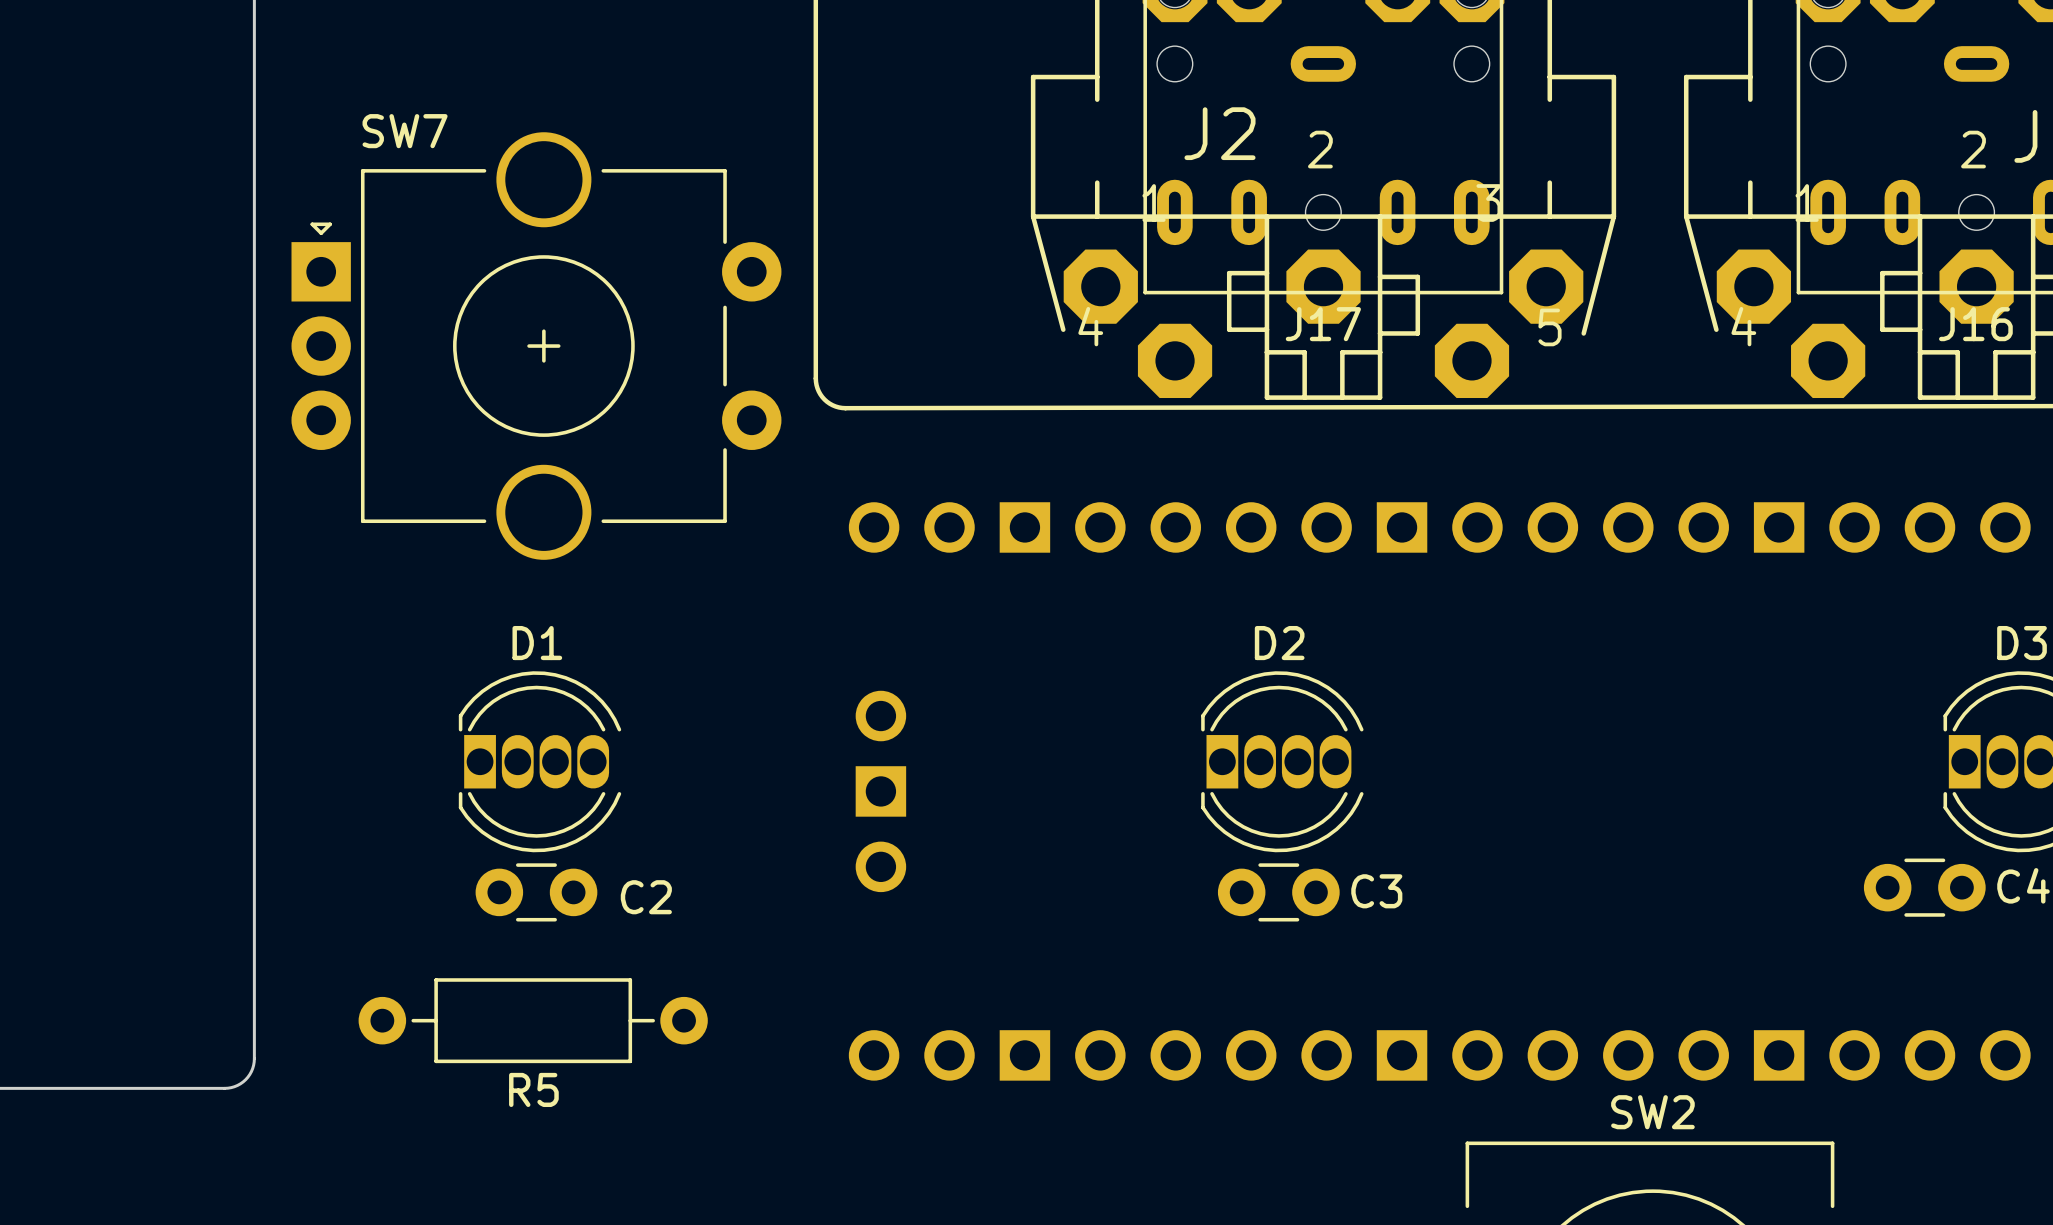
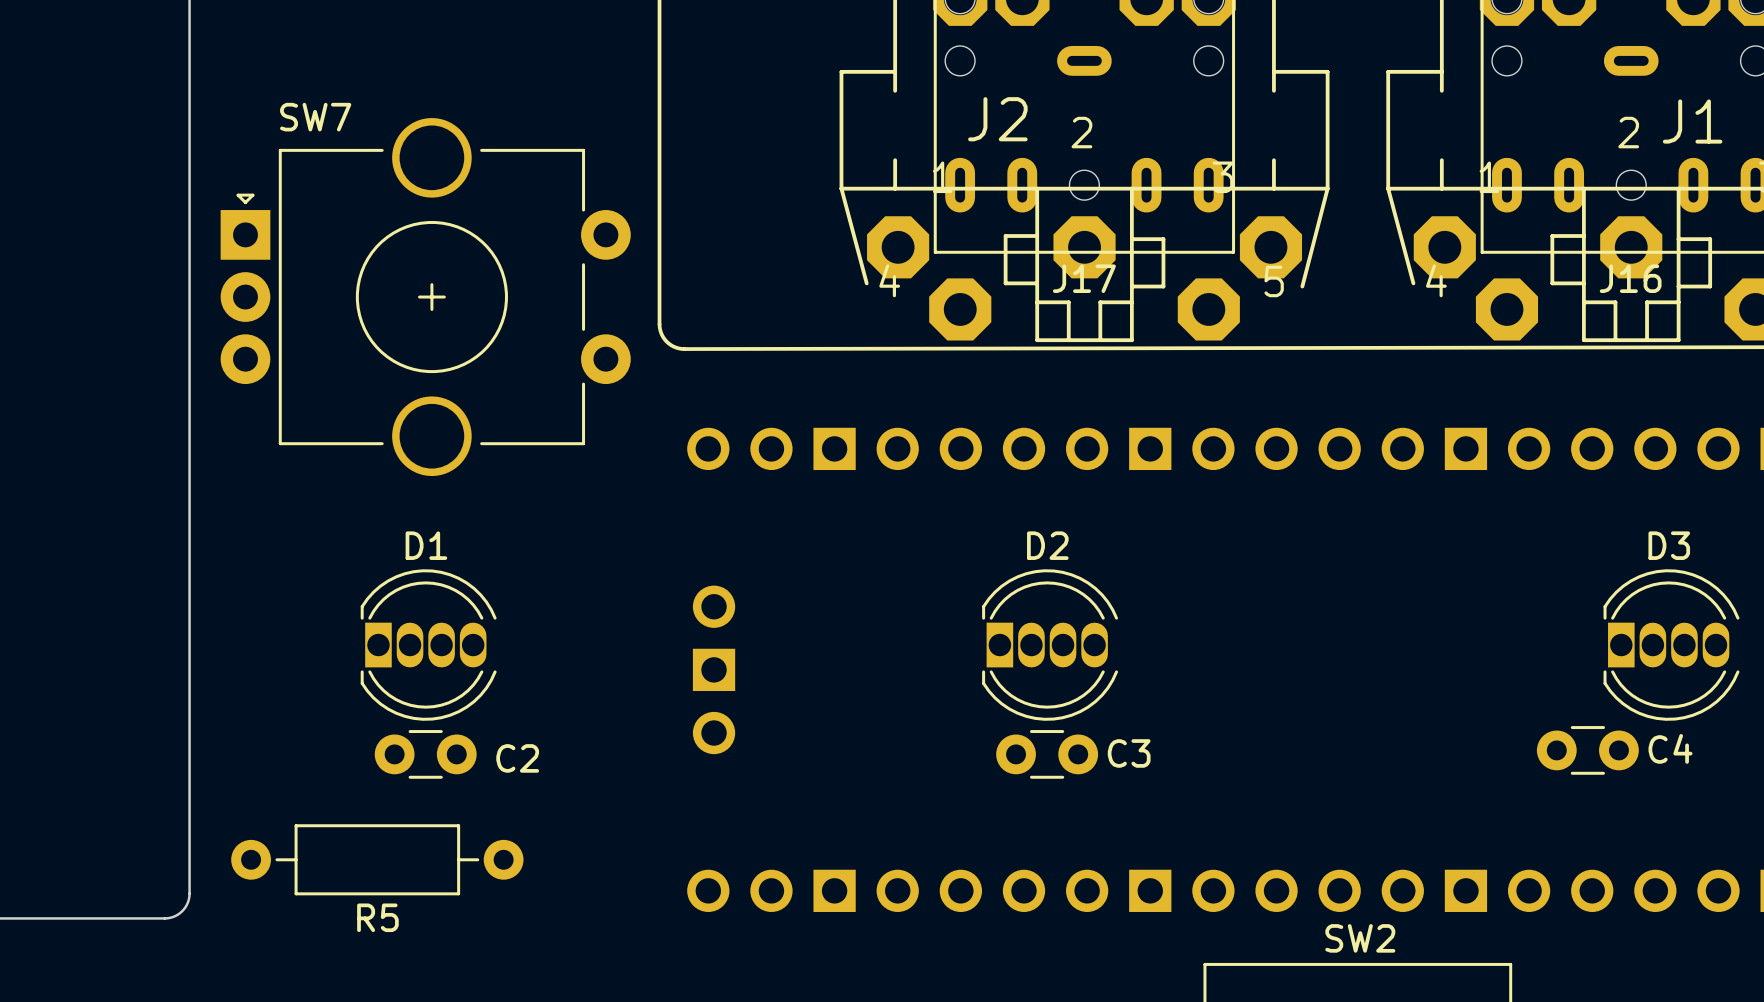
R5 position: (533, 1020) -> (377, 859)

